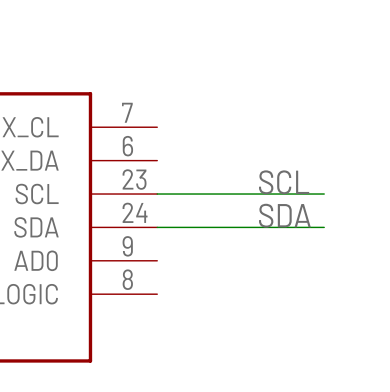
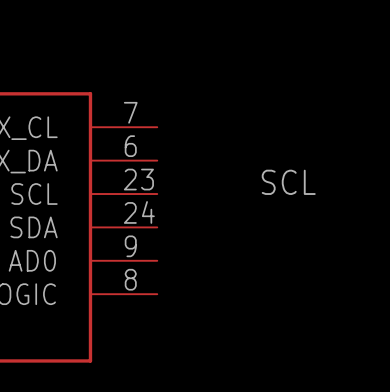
wire: (157, 194) (324, 194) -> none
label: SDA (284, 215) -> none
wire: (157, 227) (324, 227) -> none

